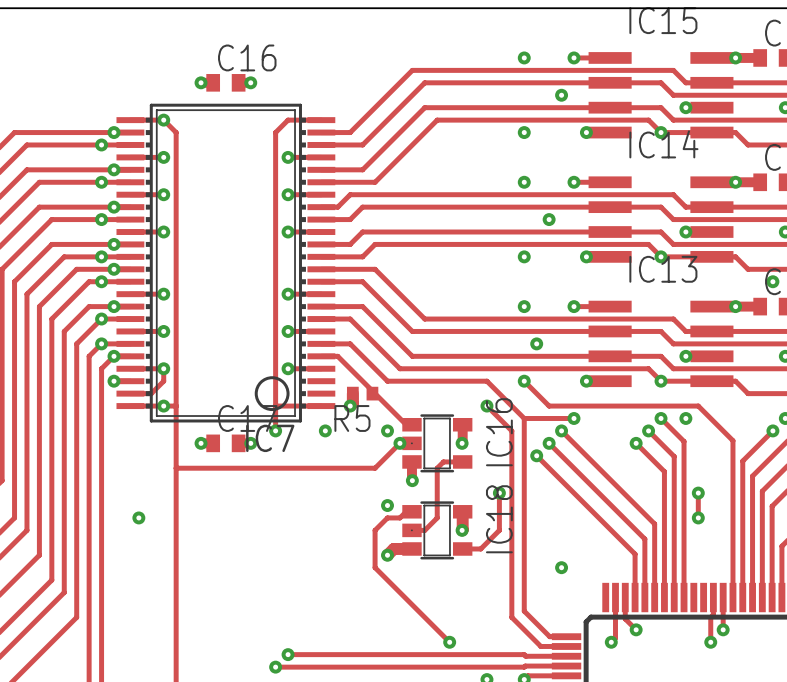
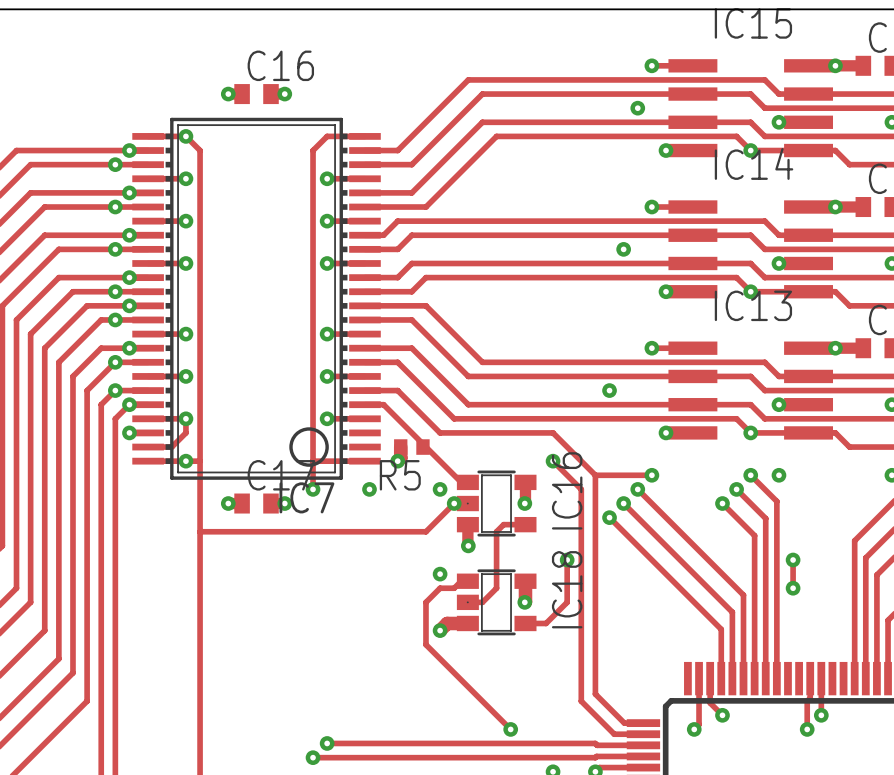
via: (524, 57) -> none
via: (524, 132) -> none
via: (524, 182) -> none
via: (524, 256) -> none
via: (772, 281) -> none
via: (524, 306) -> none
track: (524, 381) (549, 406) (698, 406) (732, 440) (732, 597) -> none
via: (524, 381) -> none
track: (772, 430) (742, 461) (742, 597) -> none
via: (772, 430) -> none
via: (138, 517) -> none
via: (561, 567) -> none

